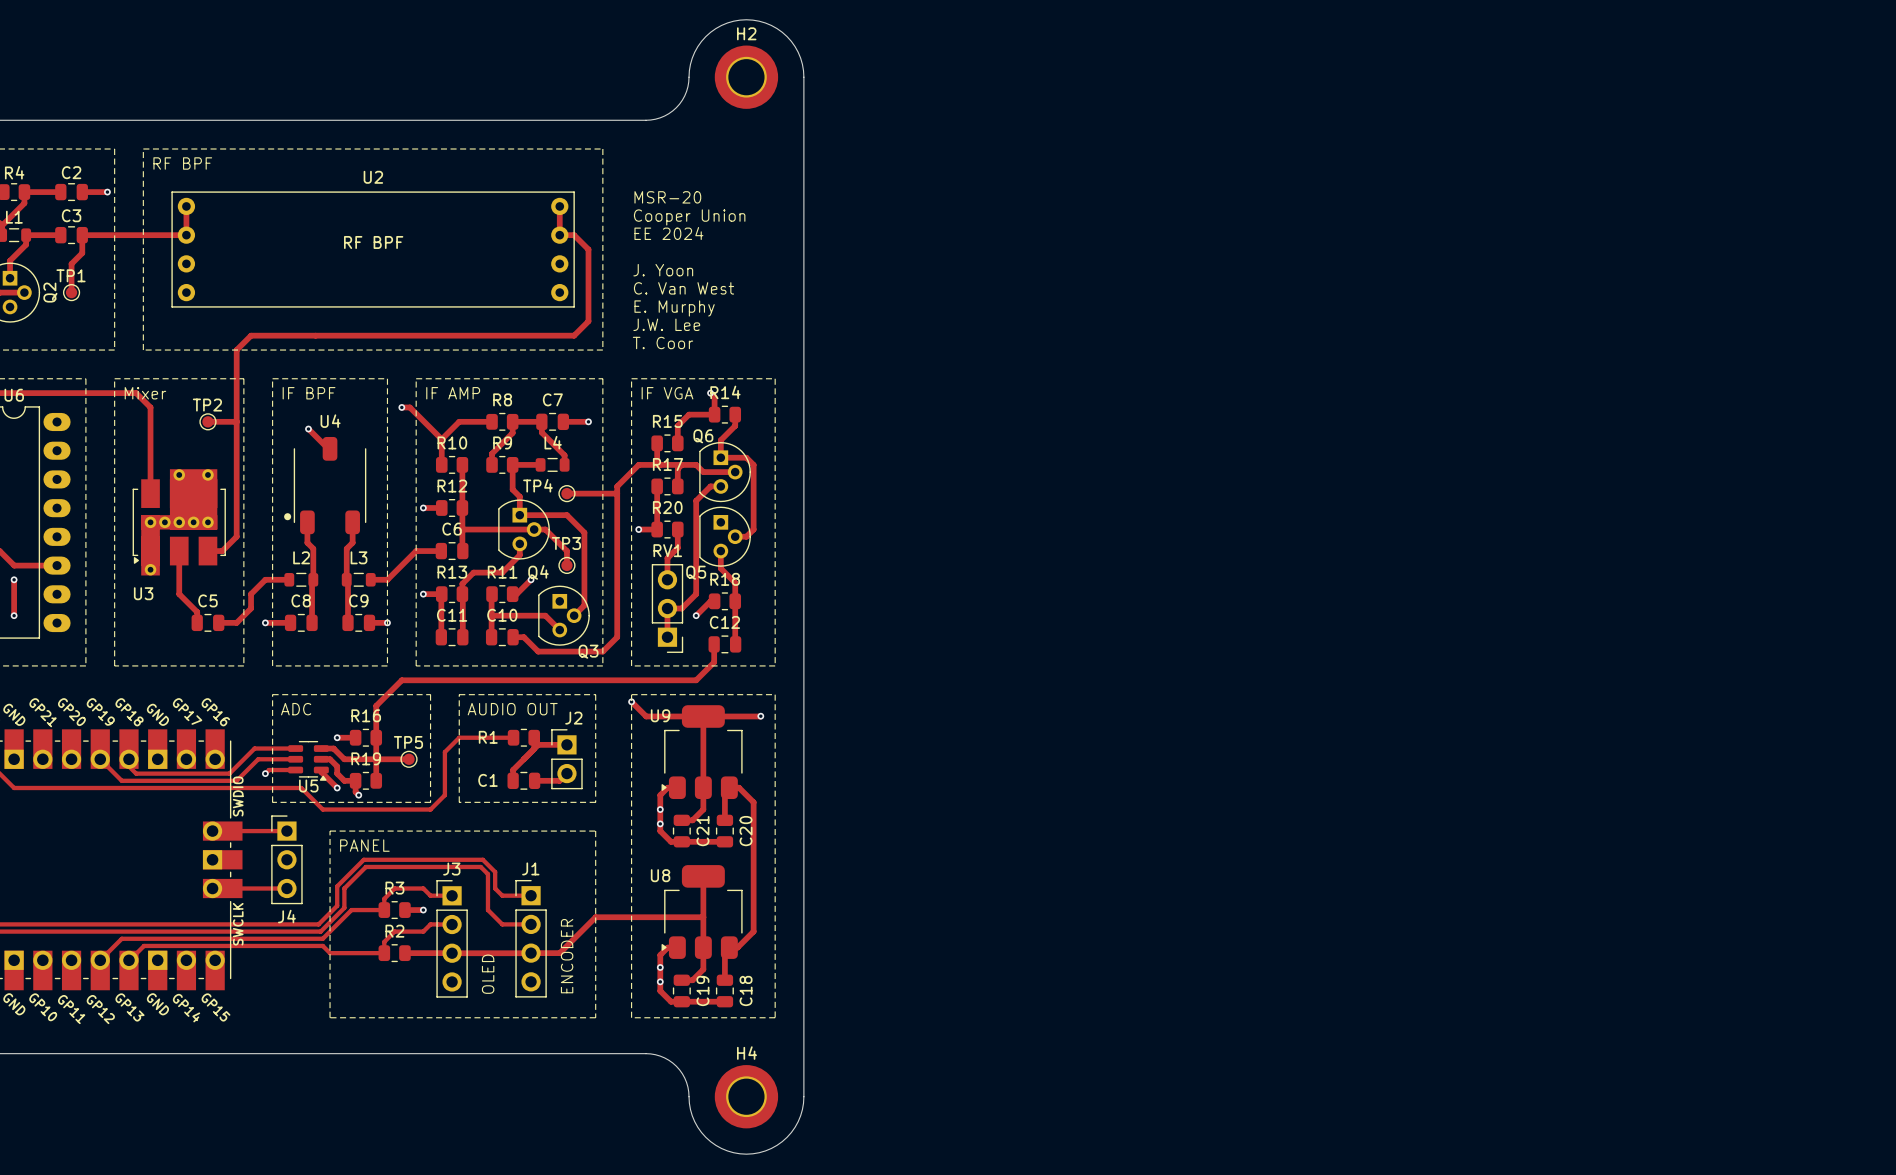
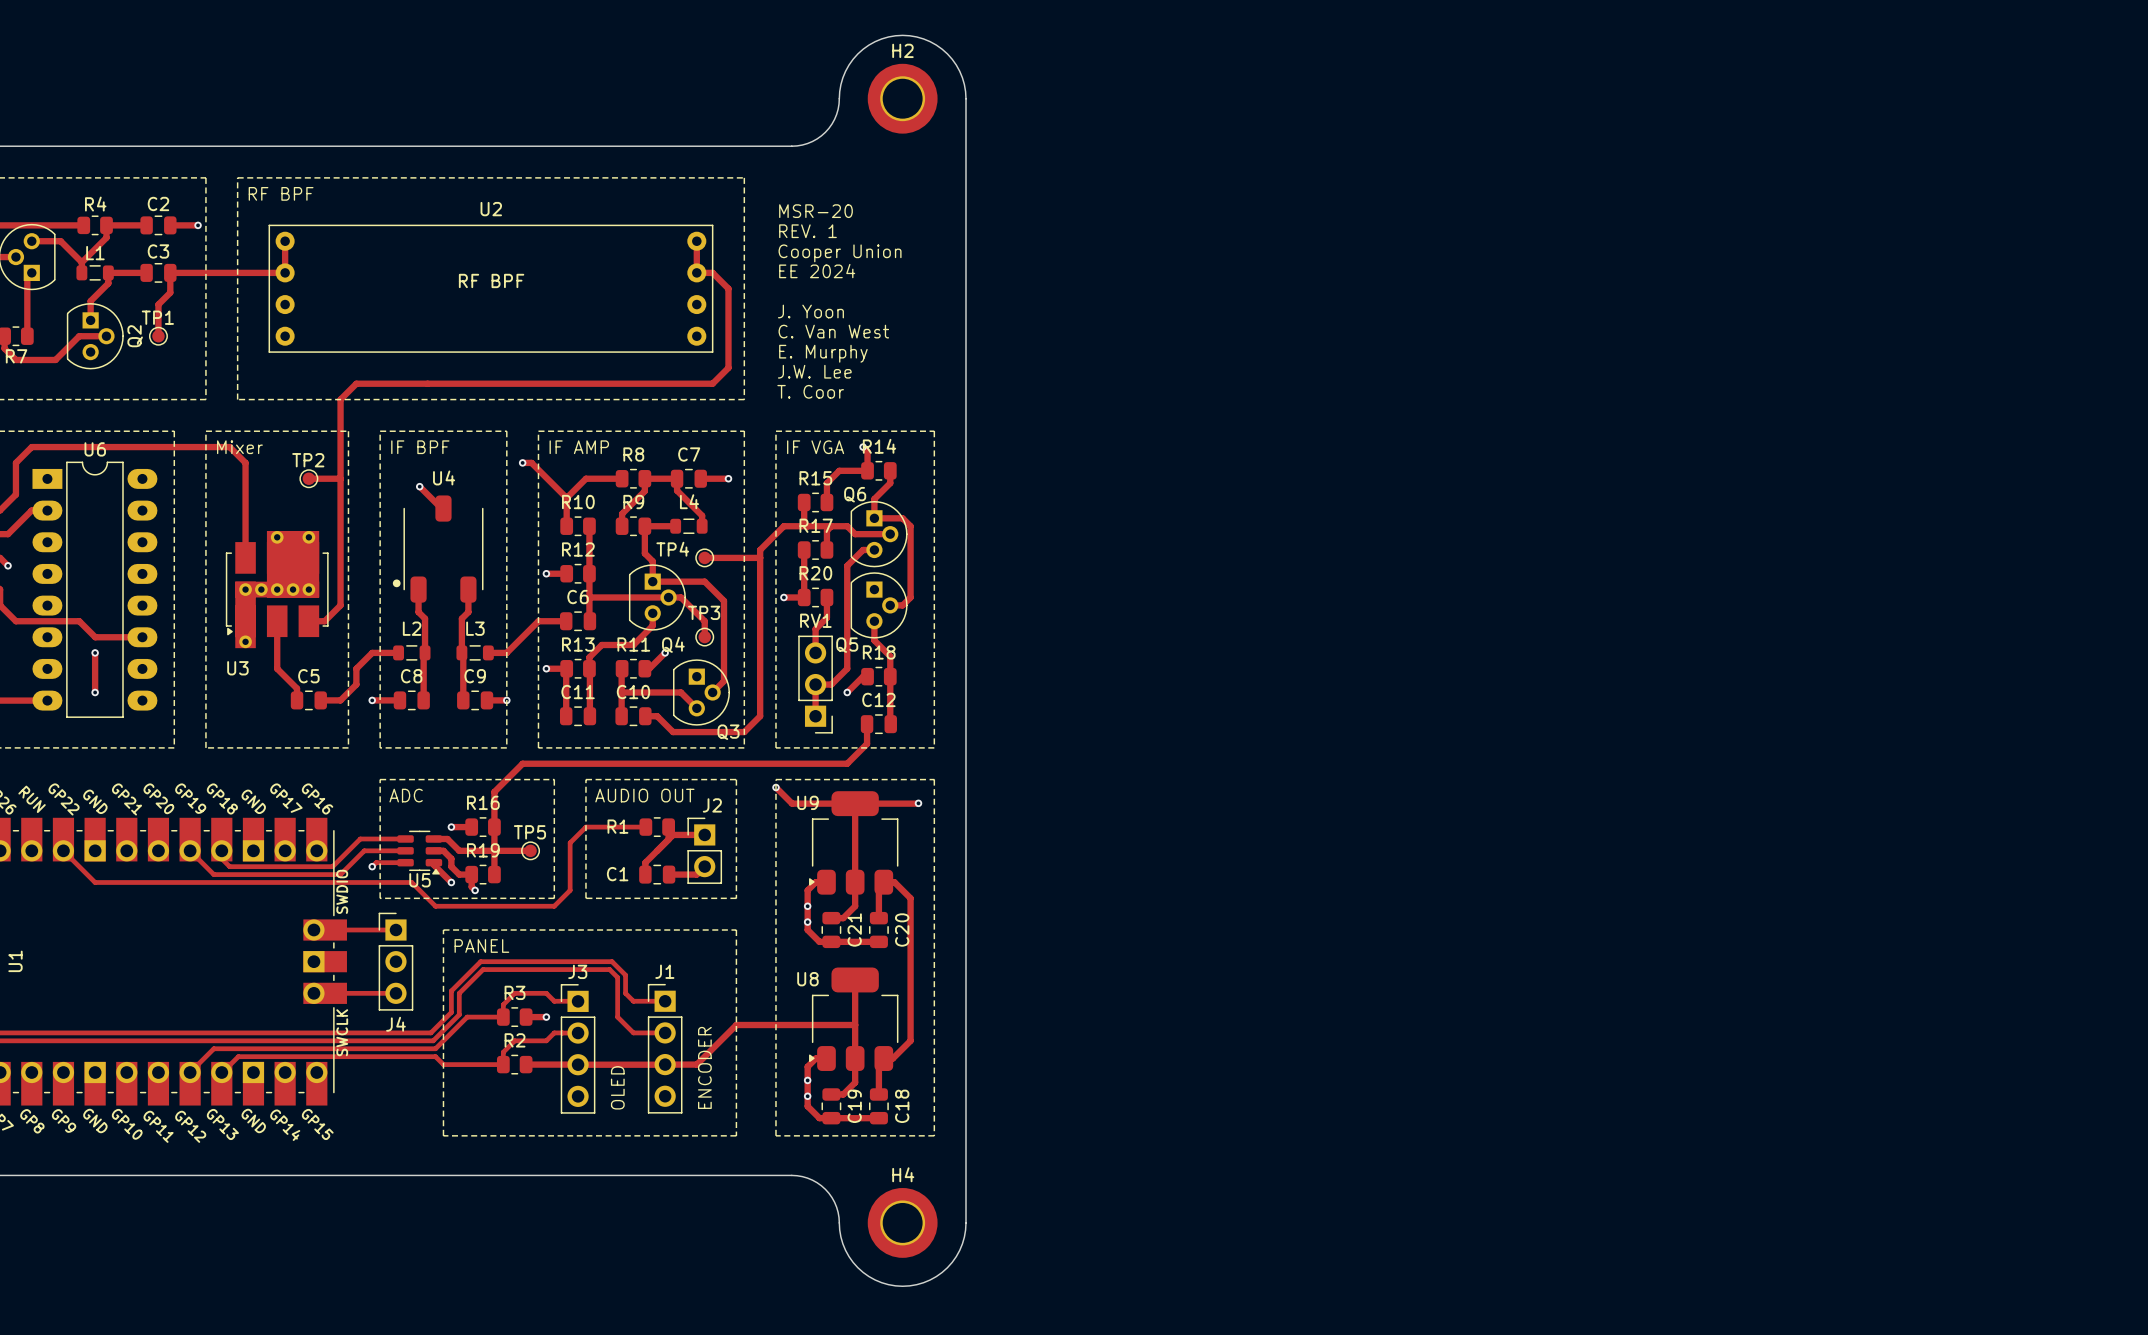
text: none -> MSR-20 (815, 211)
text: MSR-20 (667, 197) -> REV. 1 (807, 231)

